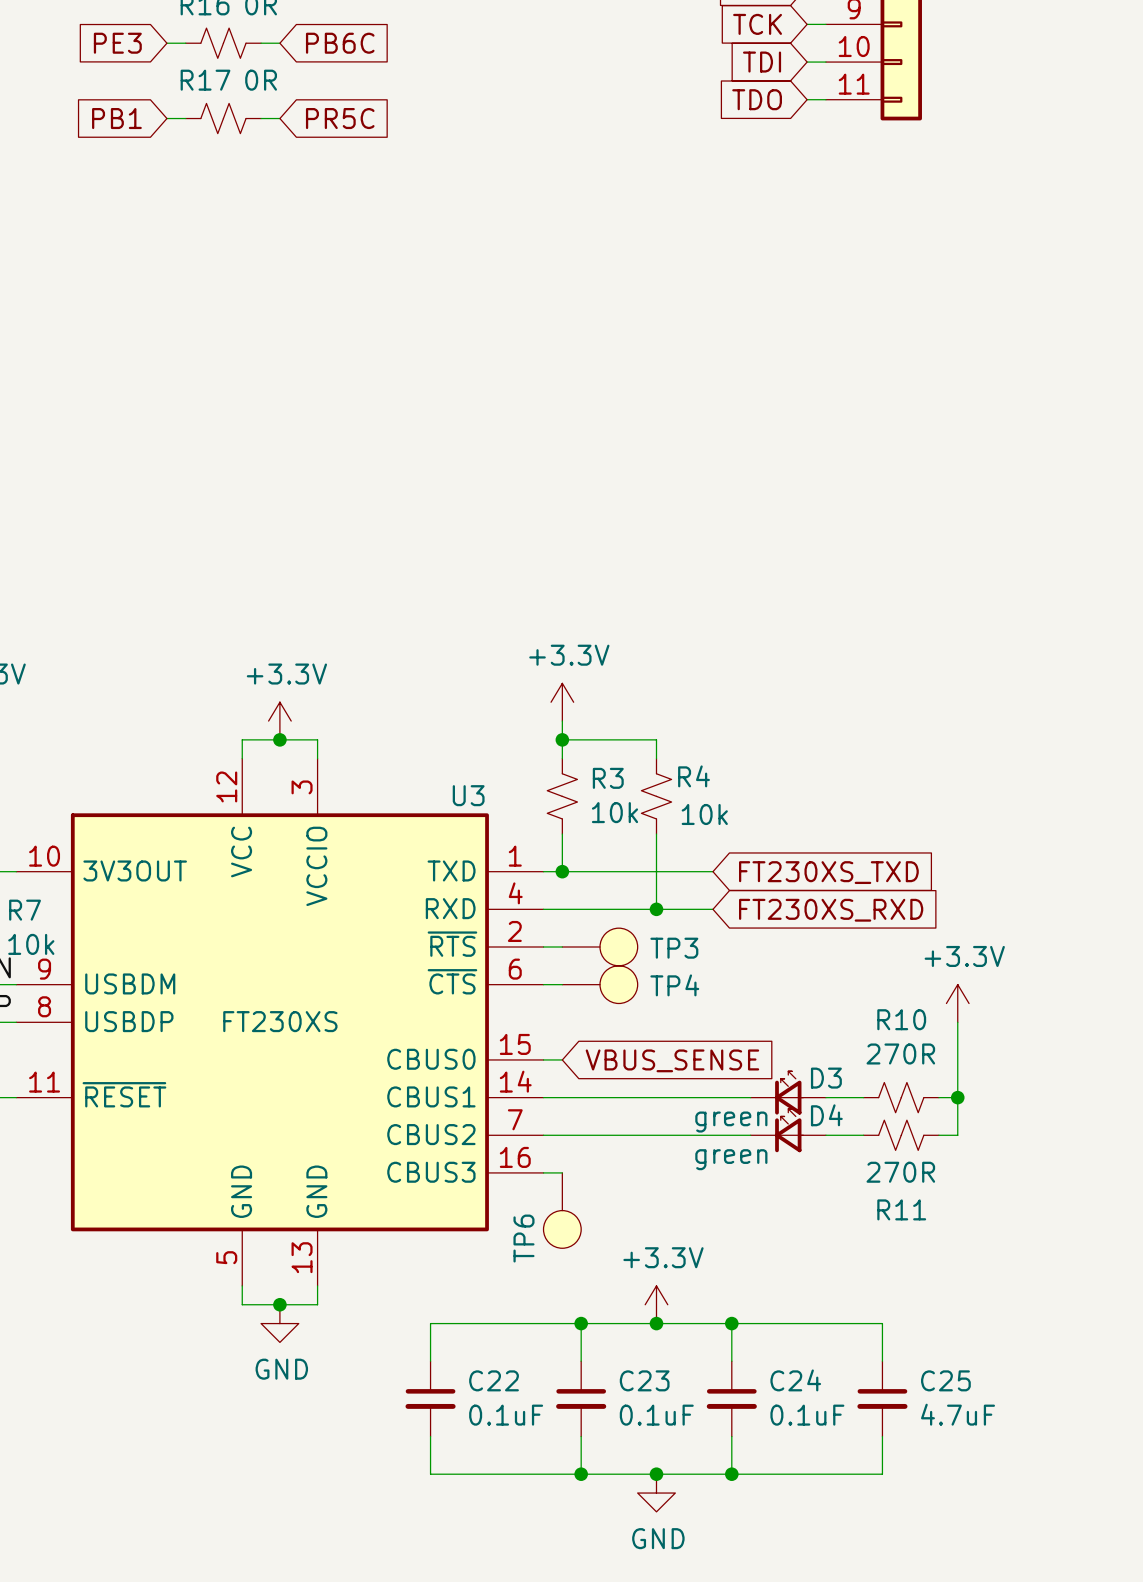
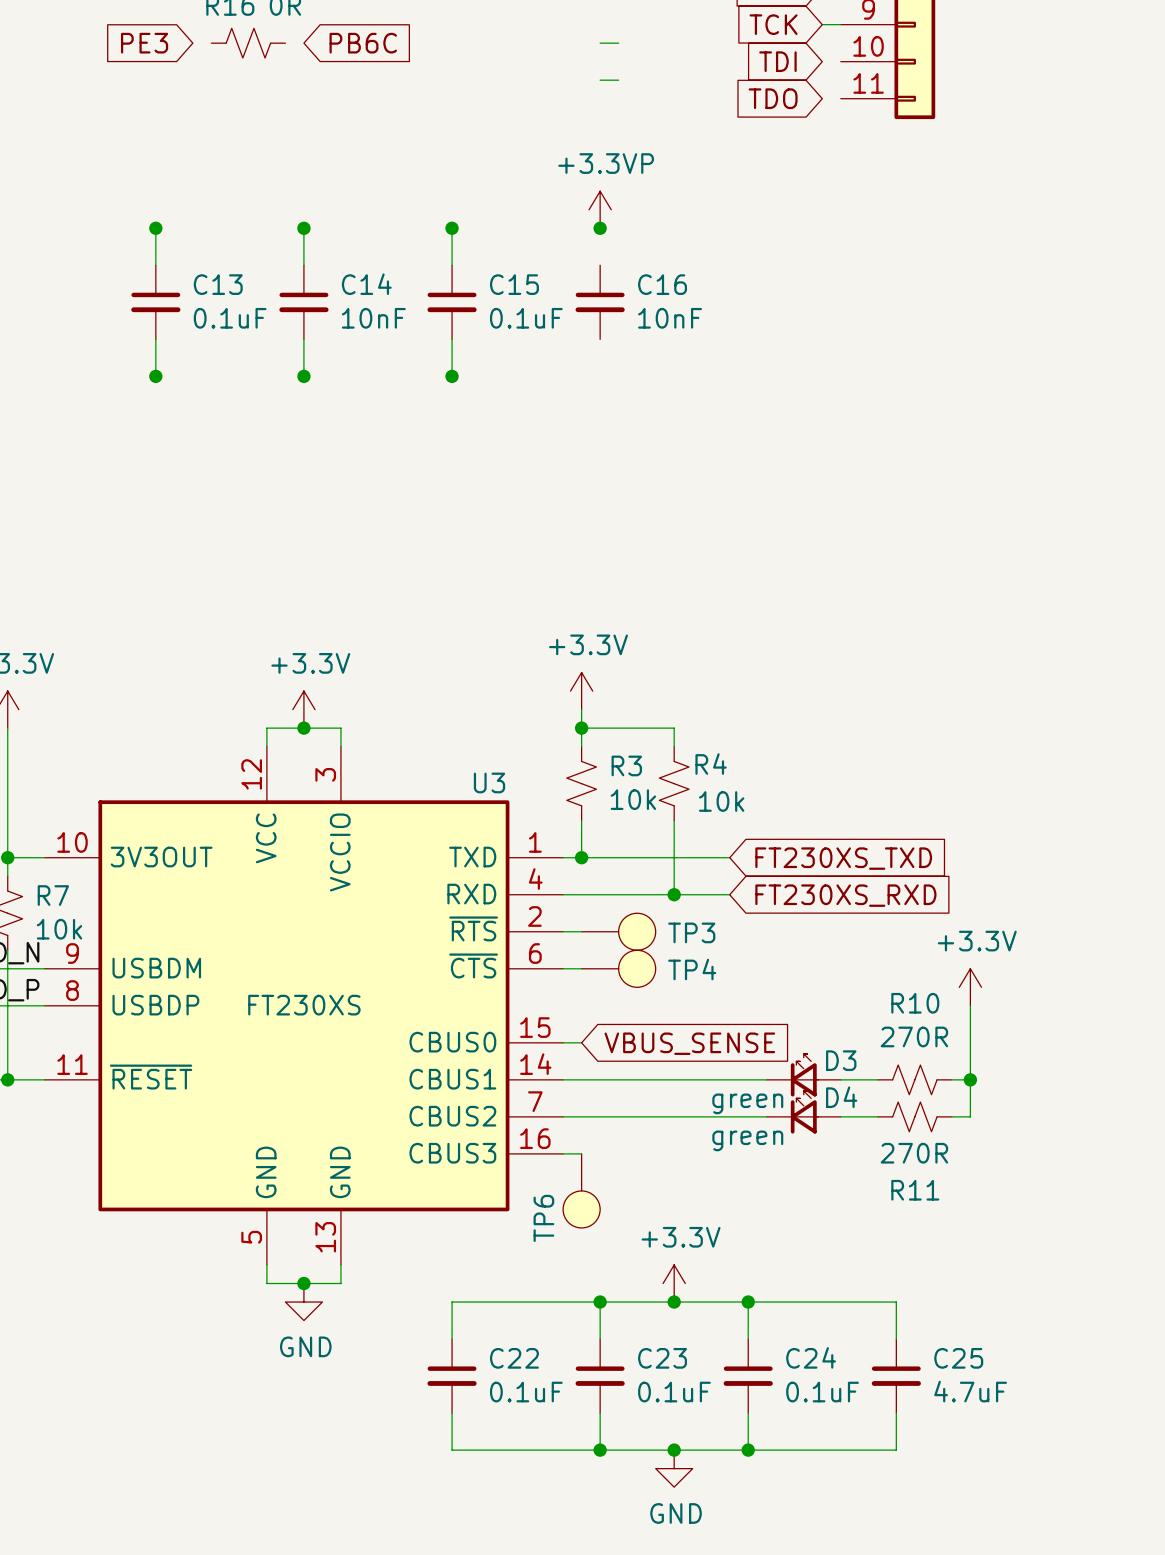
wire: (166, 43) (185, 43) -> none
wire: (261, 43) (279, 43) -> none
wire: (807, 62) (825, 62) -> (600, 43) (618, 43)
wire: (807, 99) (825, 99) -> (600, 80) (618, 80)
global label: PB1 (116, 118) -> none
wire: (166, 118) (185, 118) -> none
R17: 0R (223, 118) -> none
wire: (261, 118) (279, 118) -> none
global label: PR5C (340, 118) -> none
power symbol: none -> +3.3VP (600, 209)
wire: none -> (155, 228) (155, 265)
junction: none -> (155, 228)
wire: none -> (303, 228) (303, 265)
junction: none -> (303, 228)
wire: none -> (452, 228) (452, 265)
junction: none -> (452, 228)
junction: none -> (600, 228)
C13: none -> 0.1uF (155, 302)
C14: none -> 10nF (303, 302)
C15: none -> 0.1uF (452, 302)
C16: none -> 10nF (600, 302)
wire: none -> (155, 339) (155, 376)
wire: none -> (303, 339) (303, 376)
wire: none -> (452, 339) (452, 376)
junction: none -> (155, 376)
junction: none -> (303, 376)
junction: none -> (452, 376)

